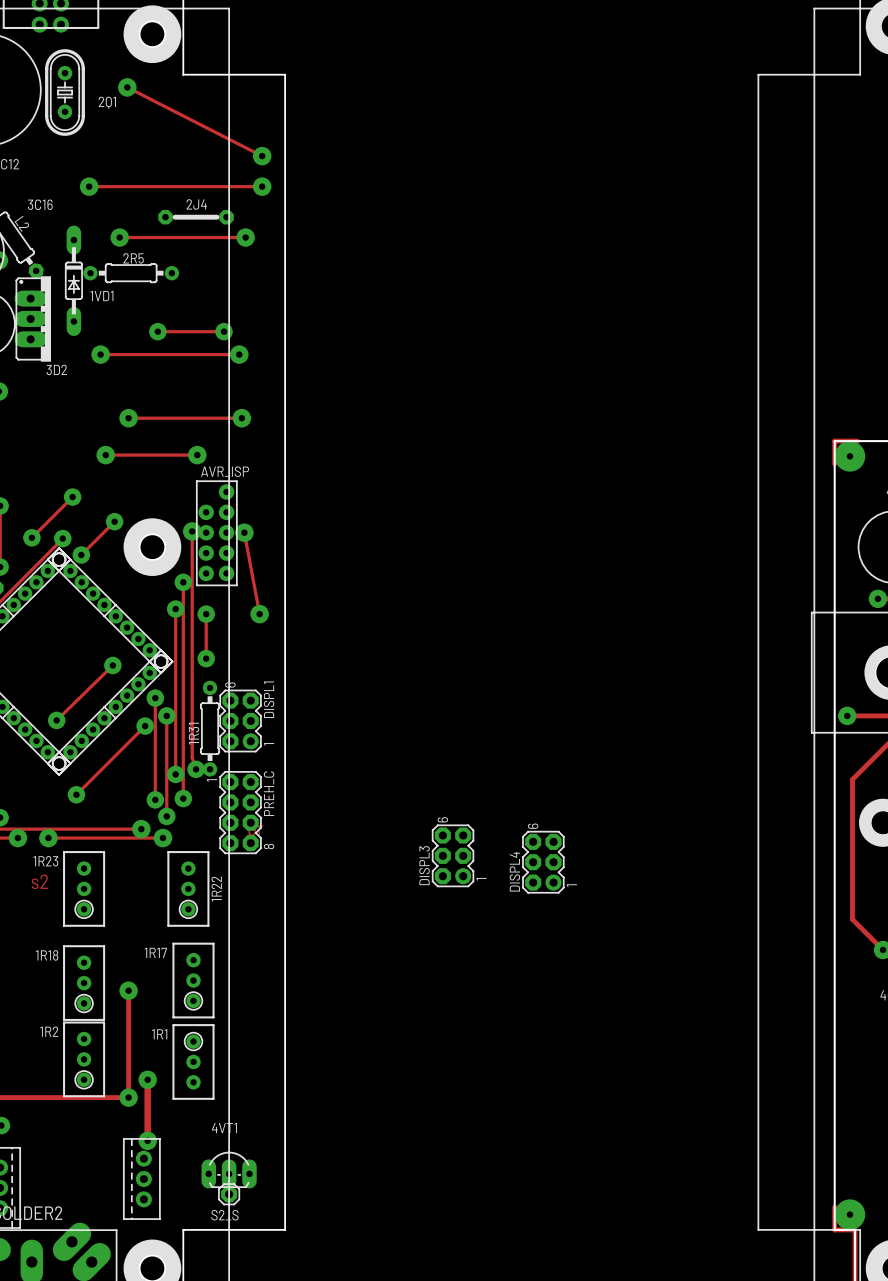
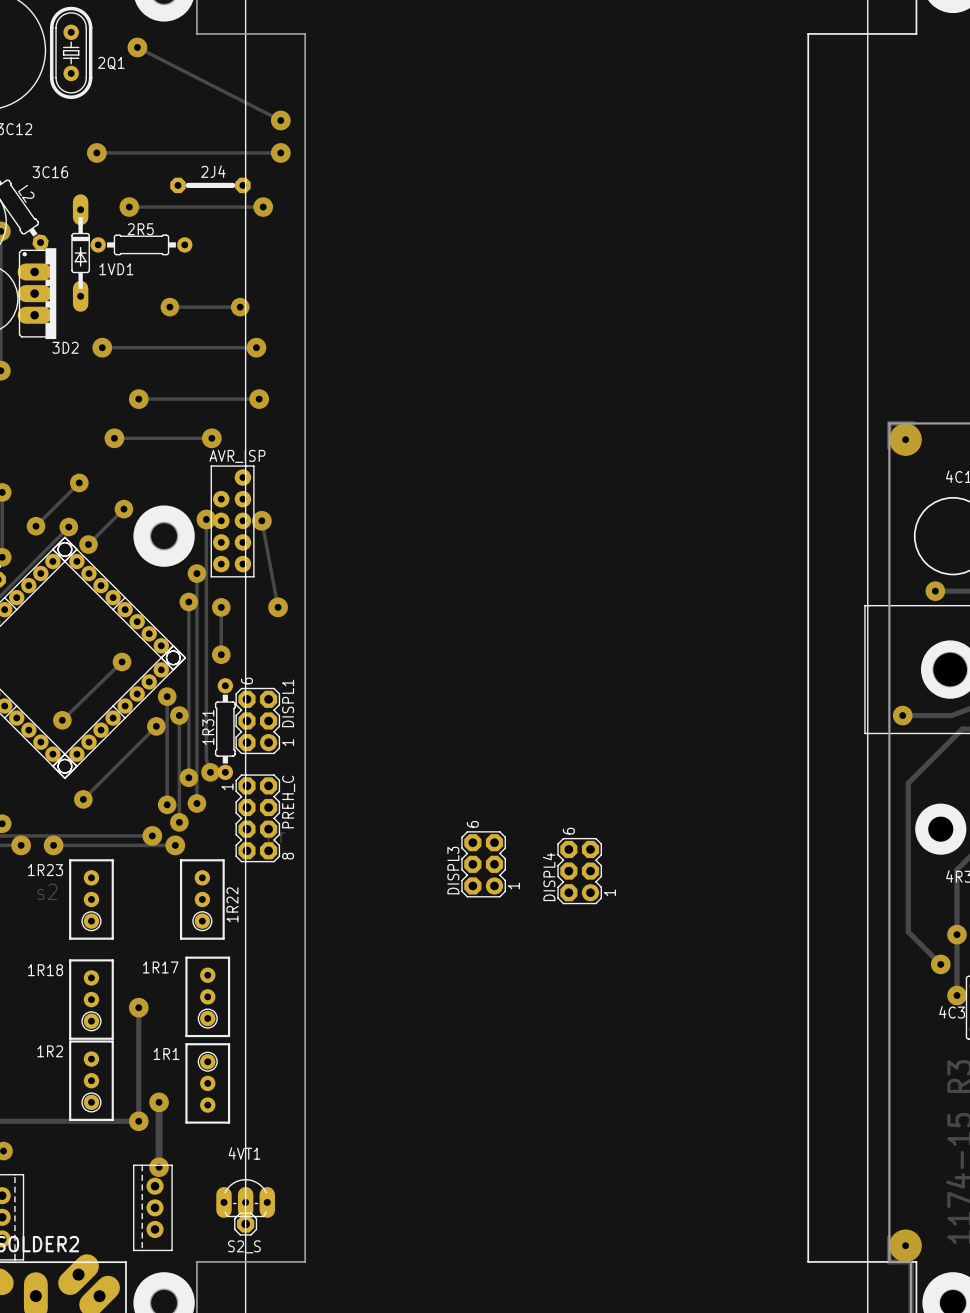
track: (100, 354) (239, 354) -> none
via position: (100, 354) -> (102, 347)
via position: (239, 354) -> (256, 347)
track: none -> (102, 347) (256, 347)

